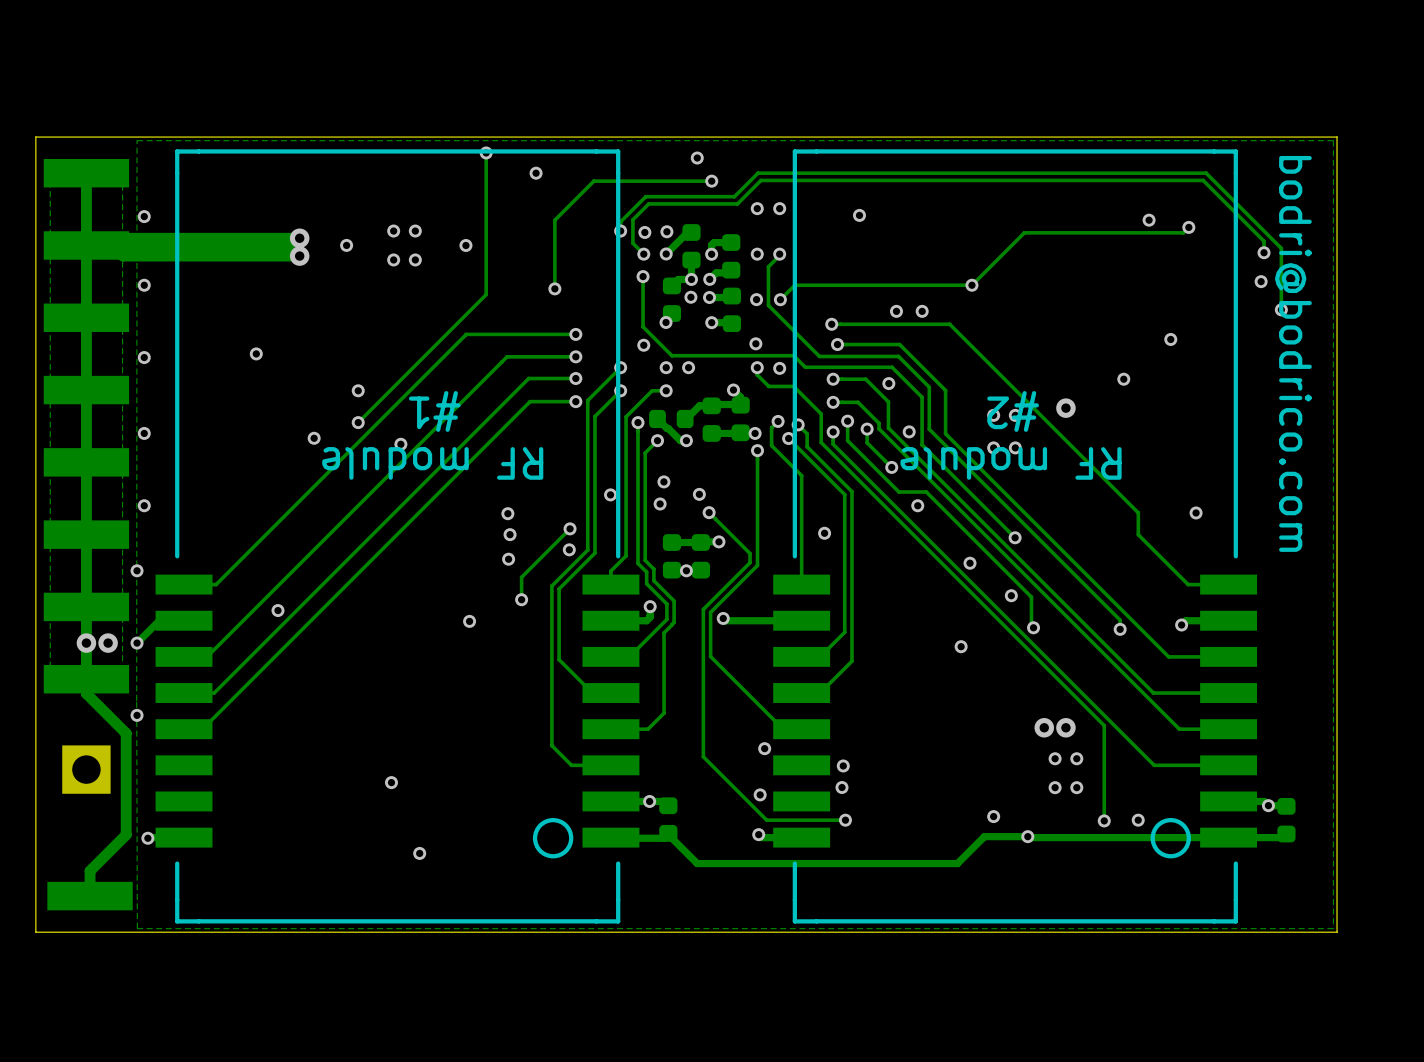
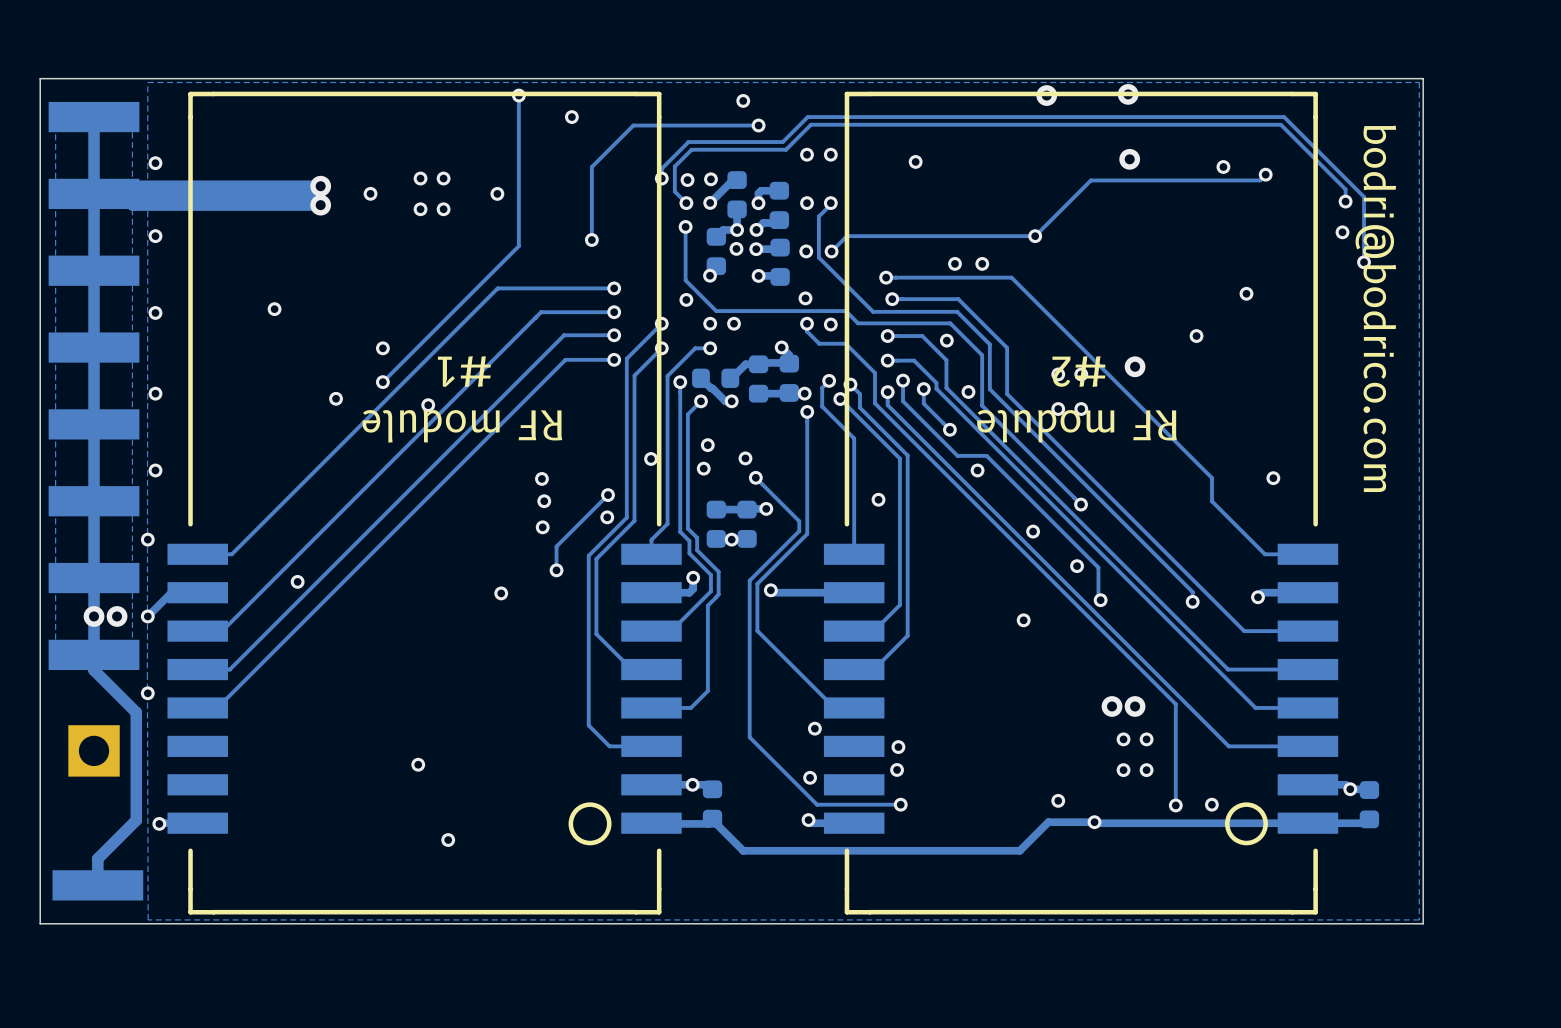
via: none -> (1128, 94)
via: none -> (1046, 95)
via: none -> (1129, 159)

